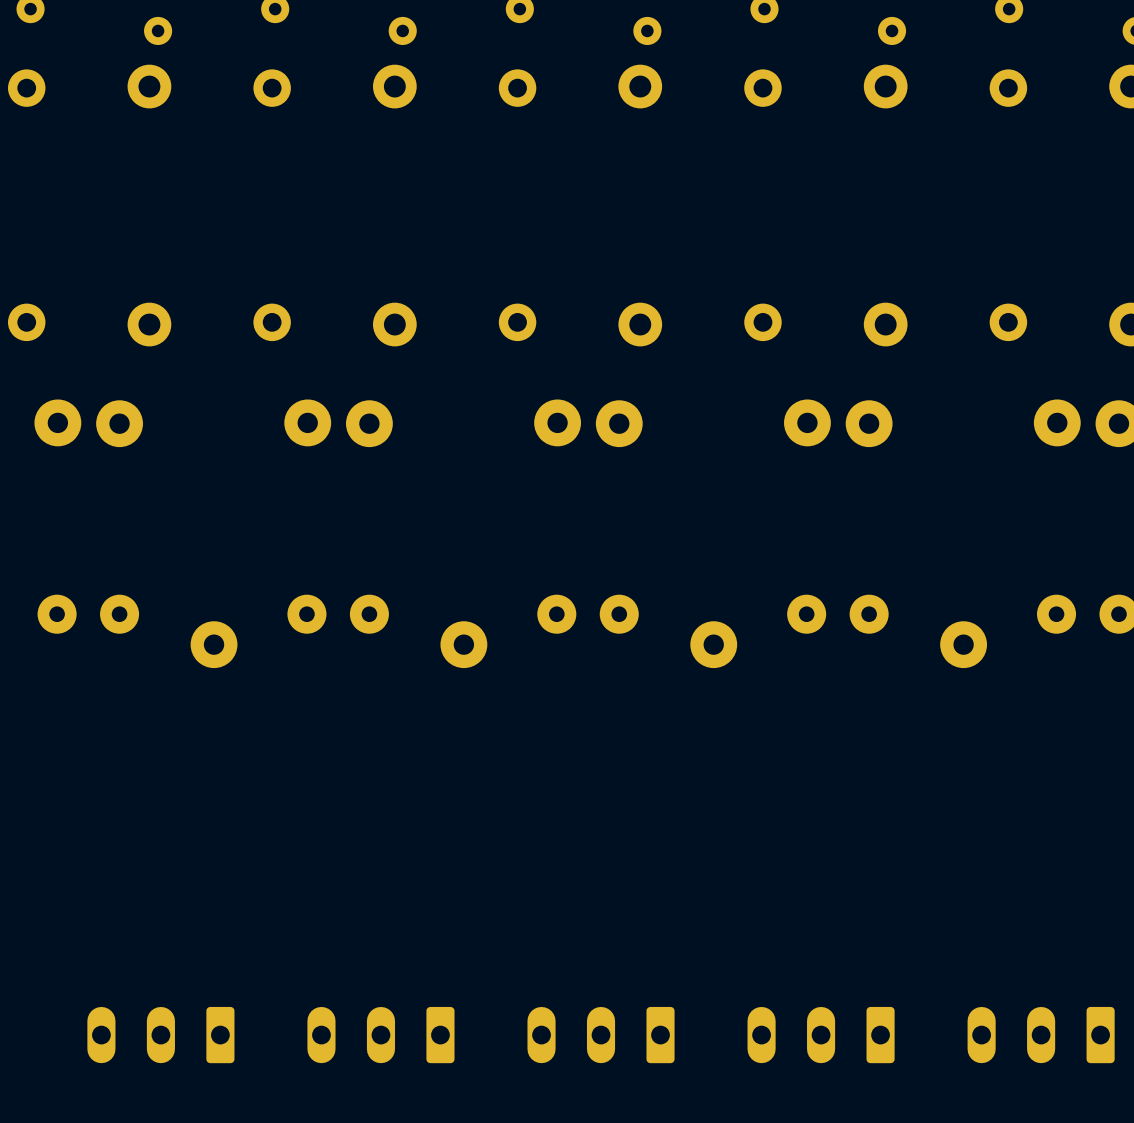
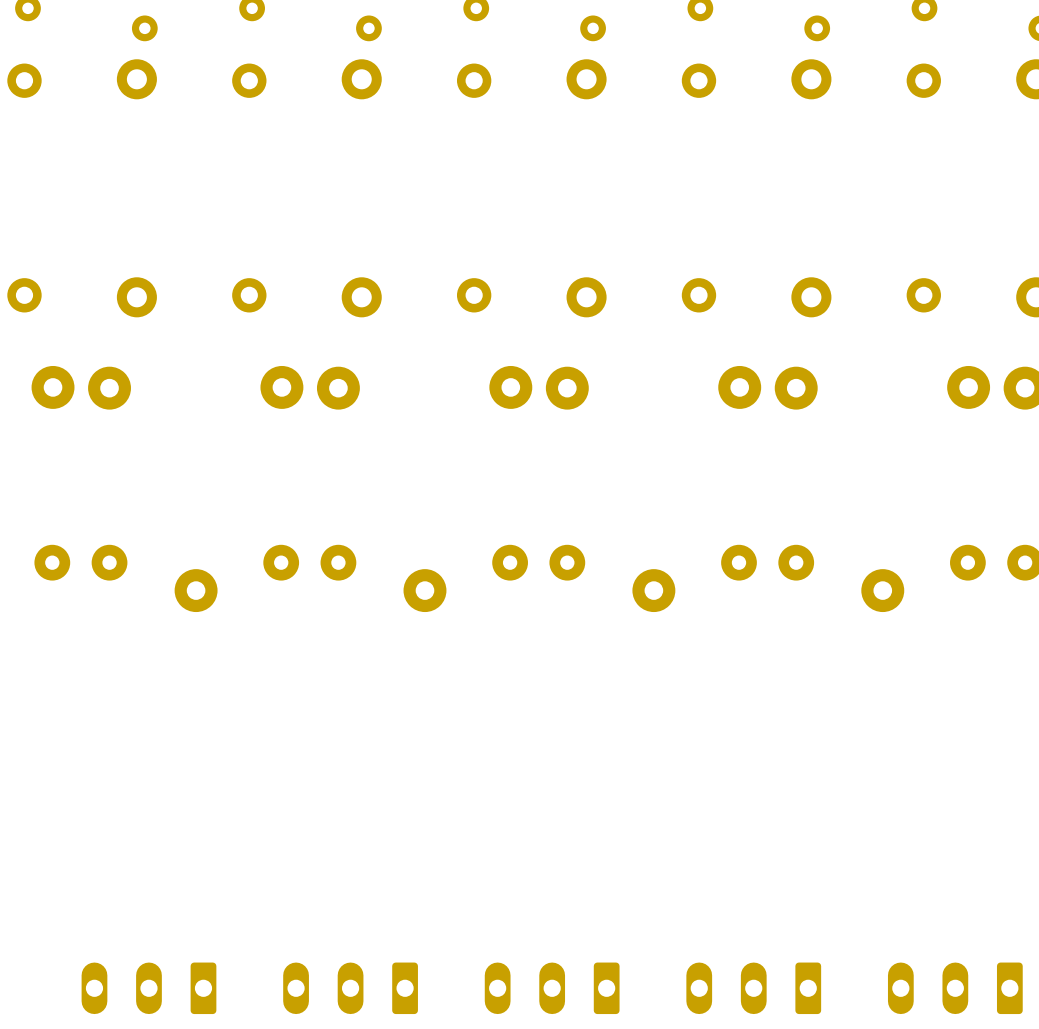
part position: (160, 1035) -> (148, 988)
part position: (380, 1035) -> (350, 988)
part position: (601, 1035) -> (552, 988)
part position: (821, 1035) -> (753, 988)
part position: (1041, 1035) -> (955, 988)

